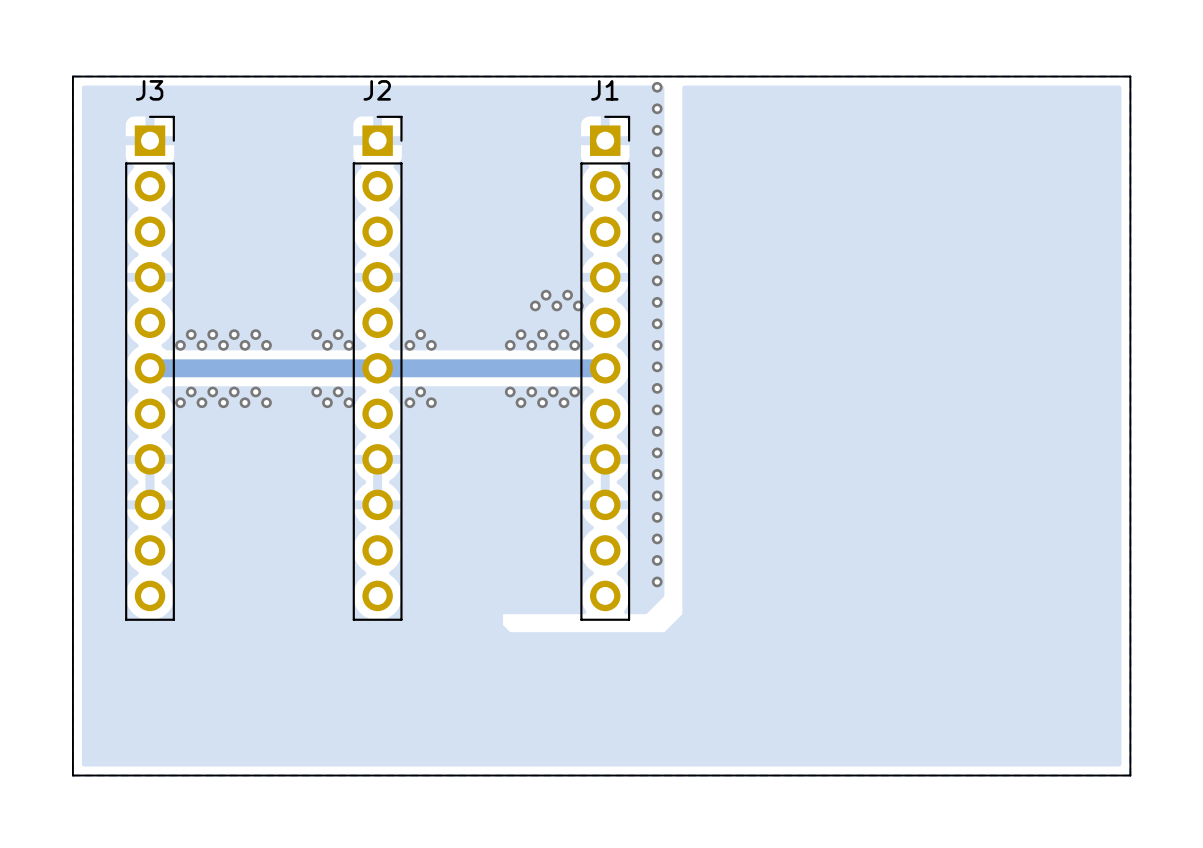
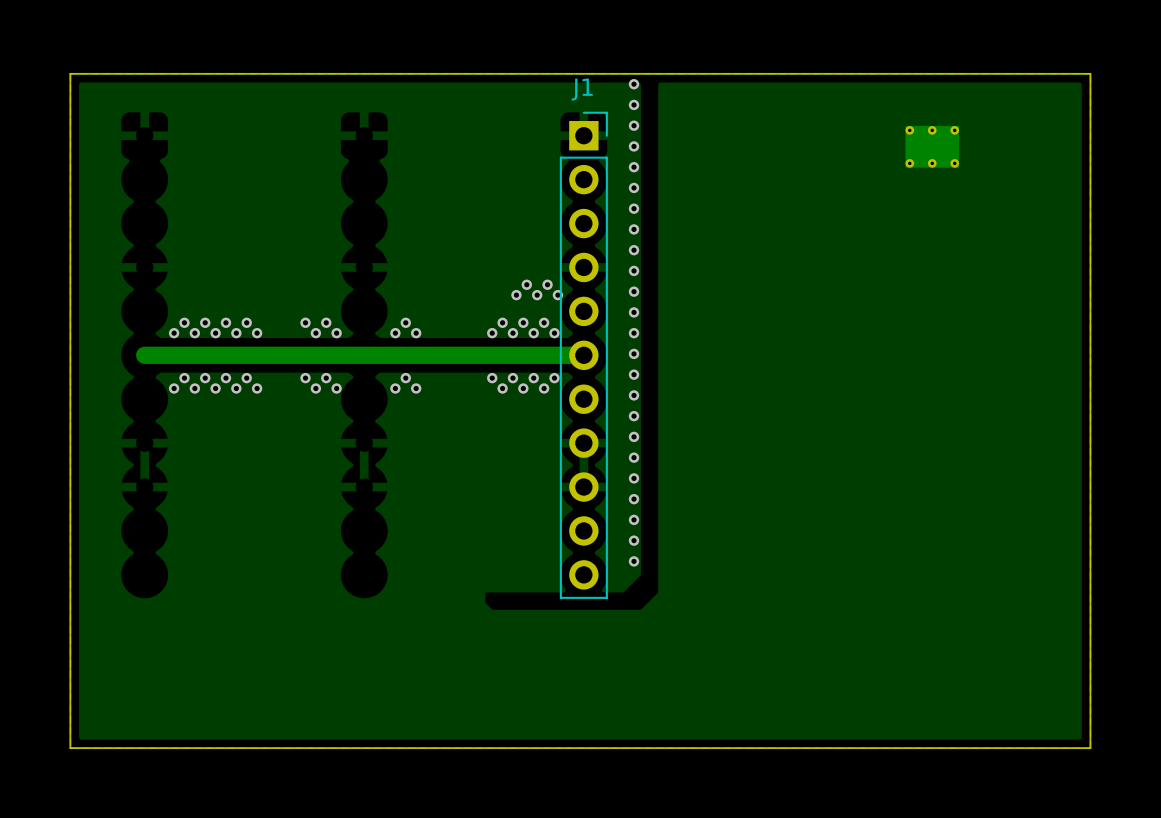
part: none -> (932, 146)
J3: (150, 368) -> none
J2: (377, 368) -> none

